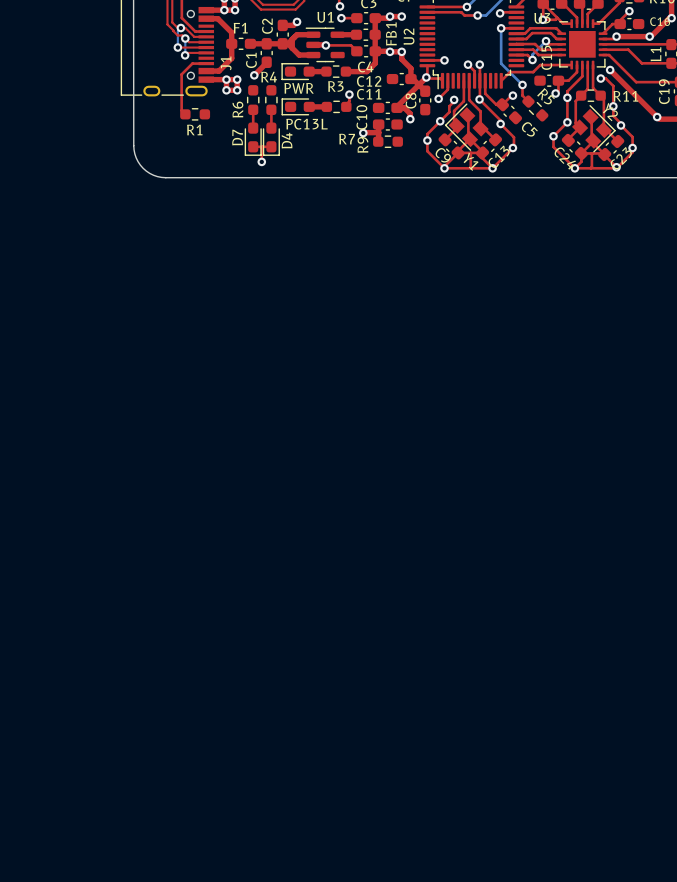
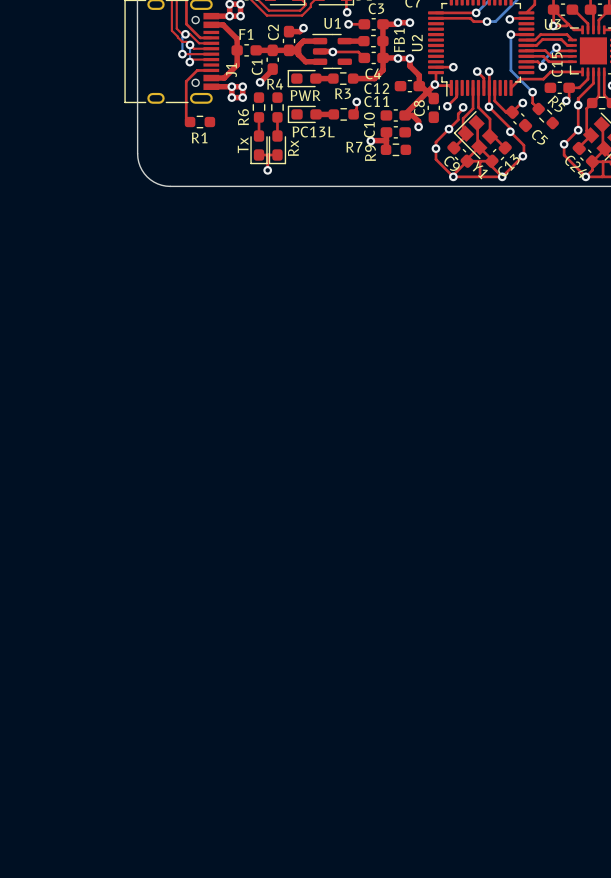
D7 name: D7 (237, 137) -> Tx (243, 145)
D4 name: D4 (287, 140) -> Rx (293, 148)

